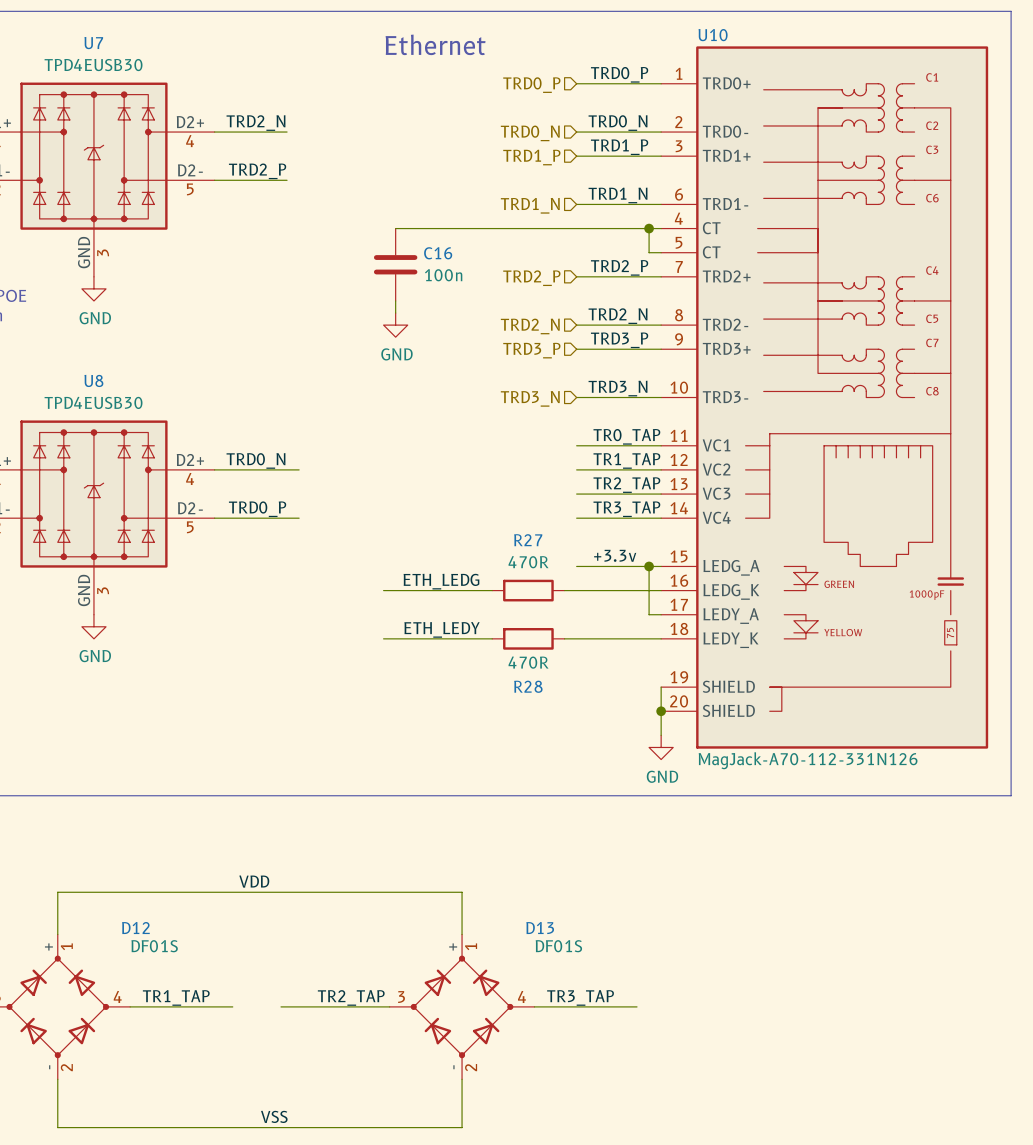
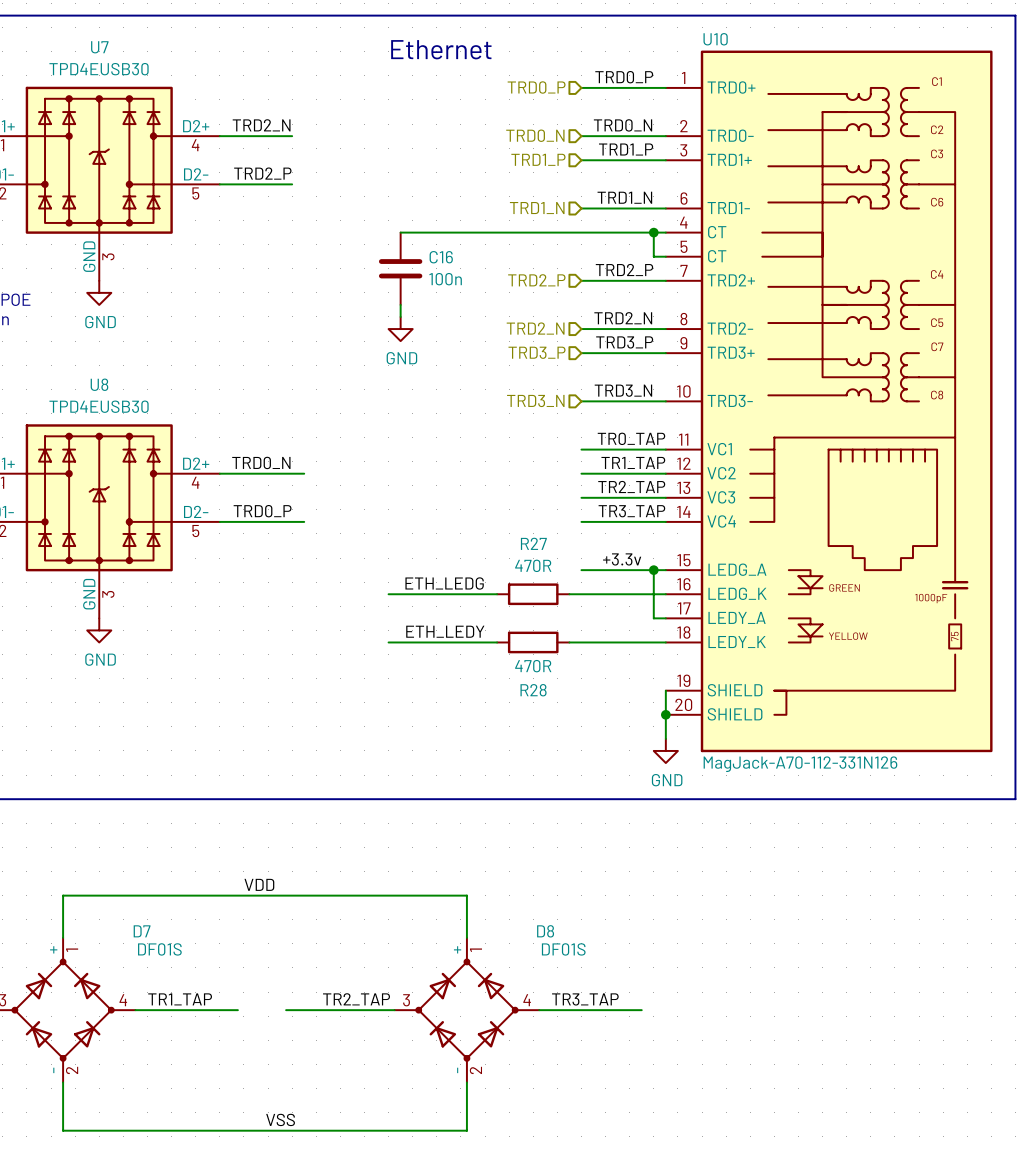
D12 name: D12 (135, 928) -> D7 (142, 931)
D13 name: D13 (540, 928) -> D8 (545, 931)

